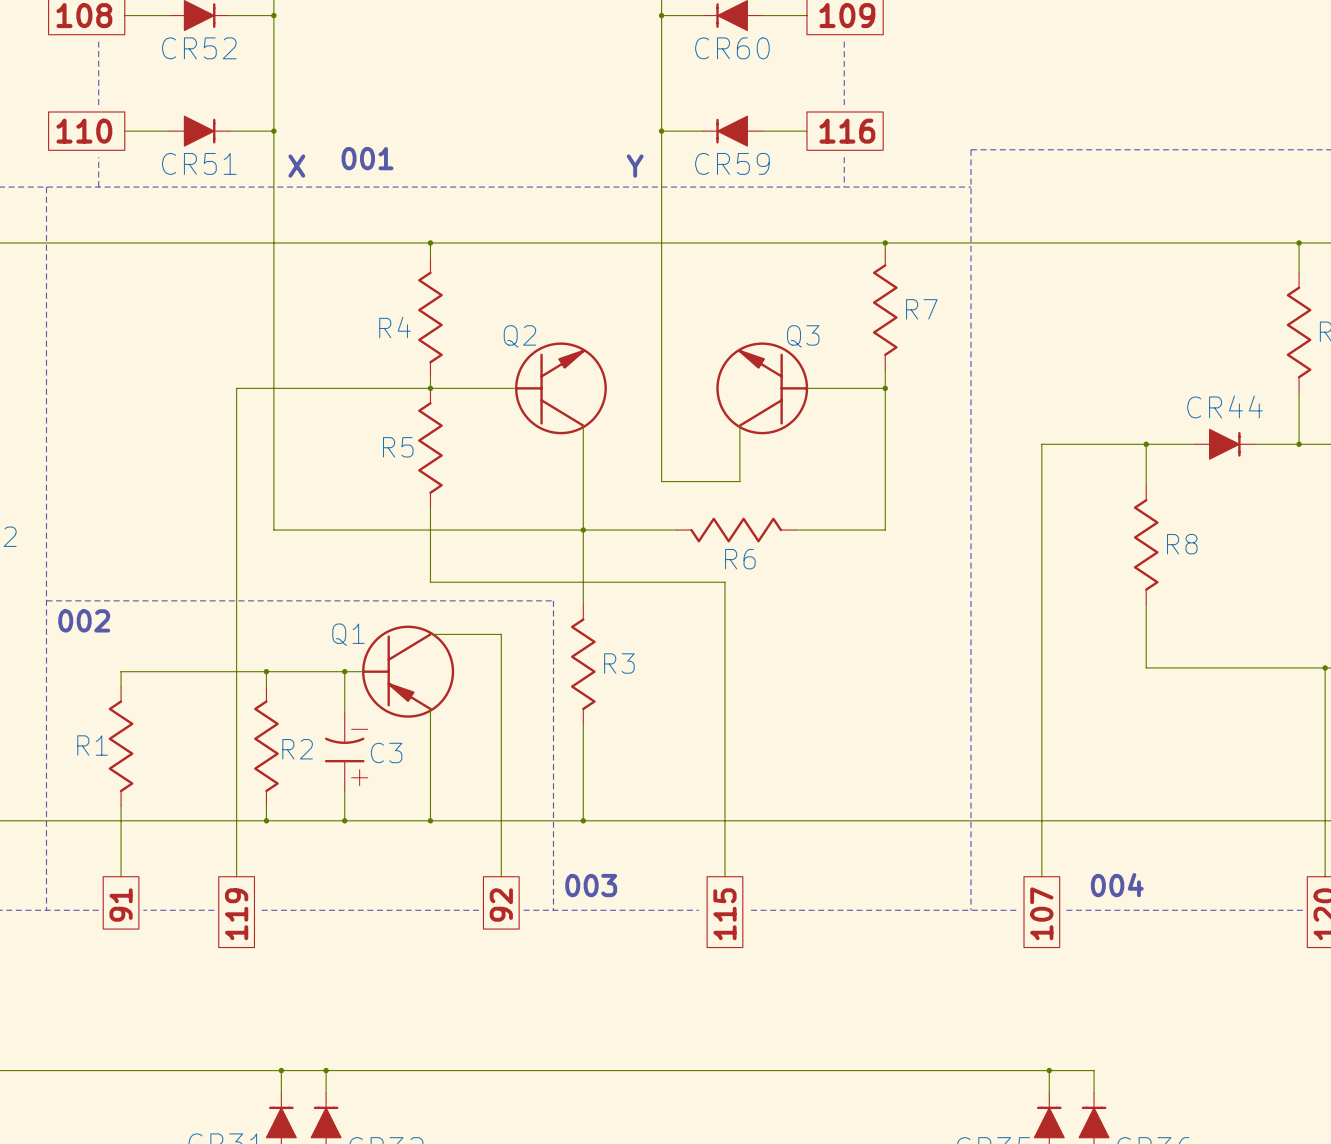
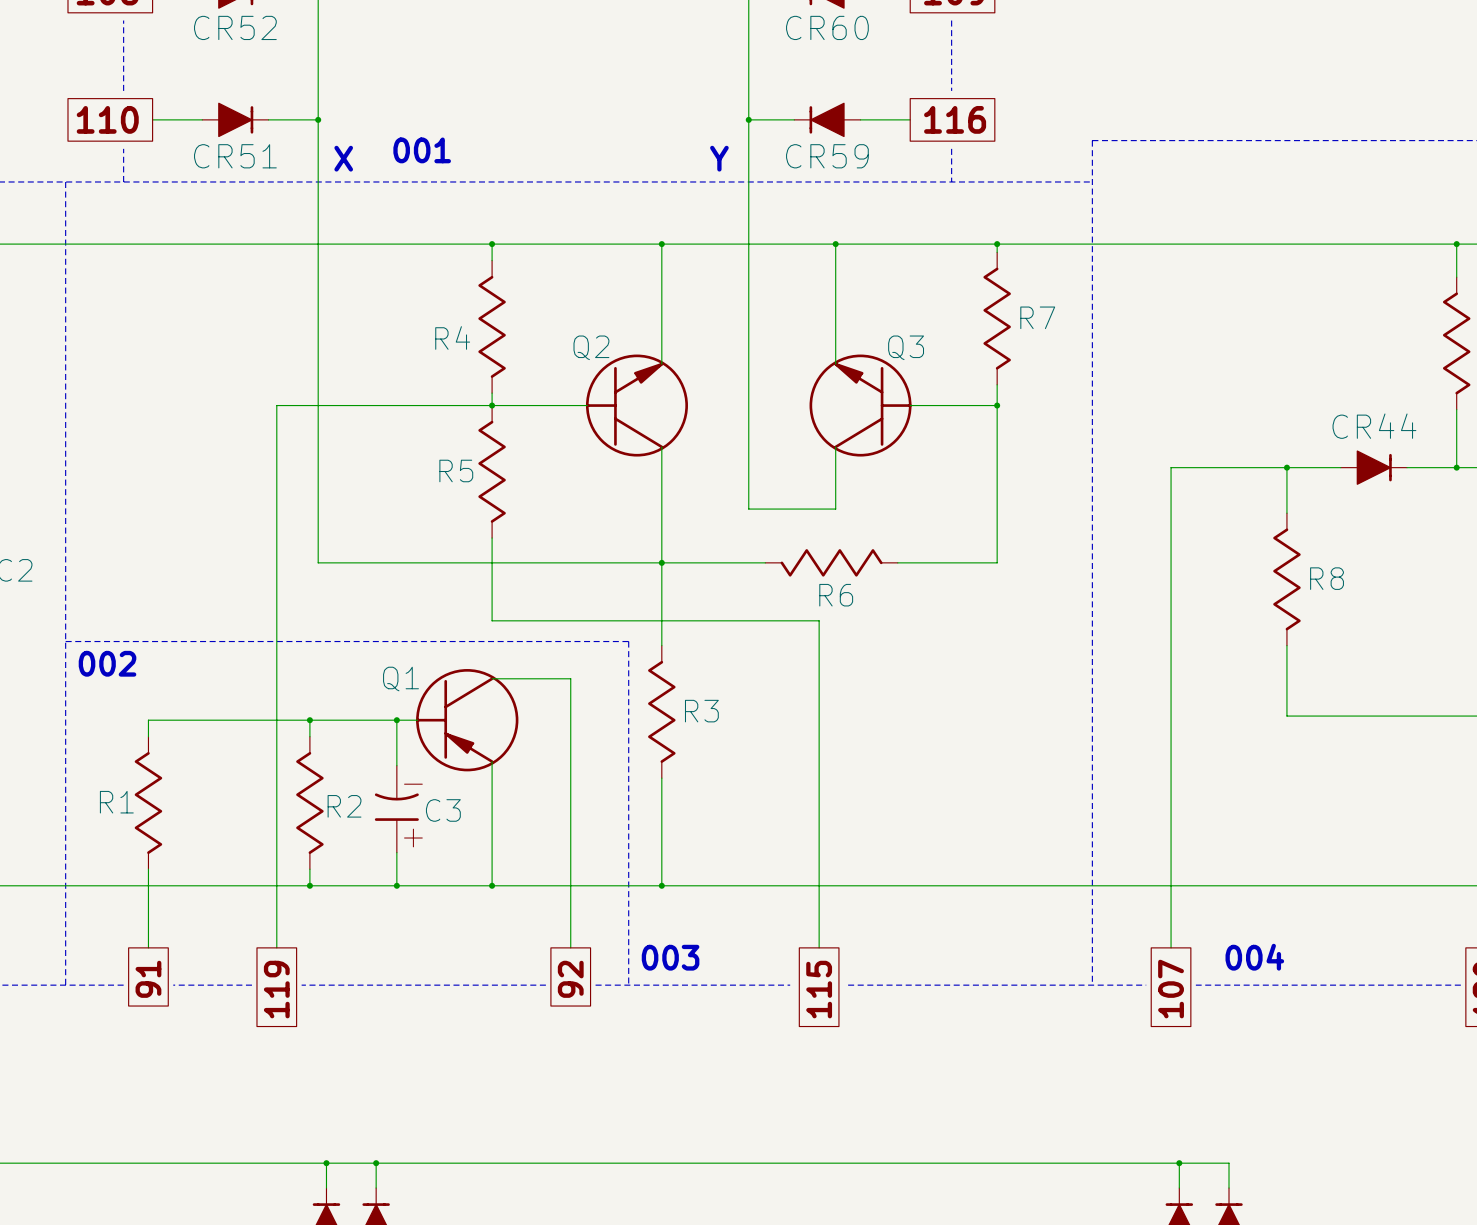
wire: none -> (661, 244) (661, 364)
junction: none -> (661, 244)
wire: none -> (835, 244) (835, 364)
junction: none -> (835, 244)

